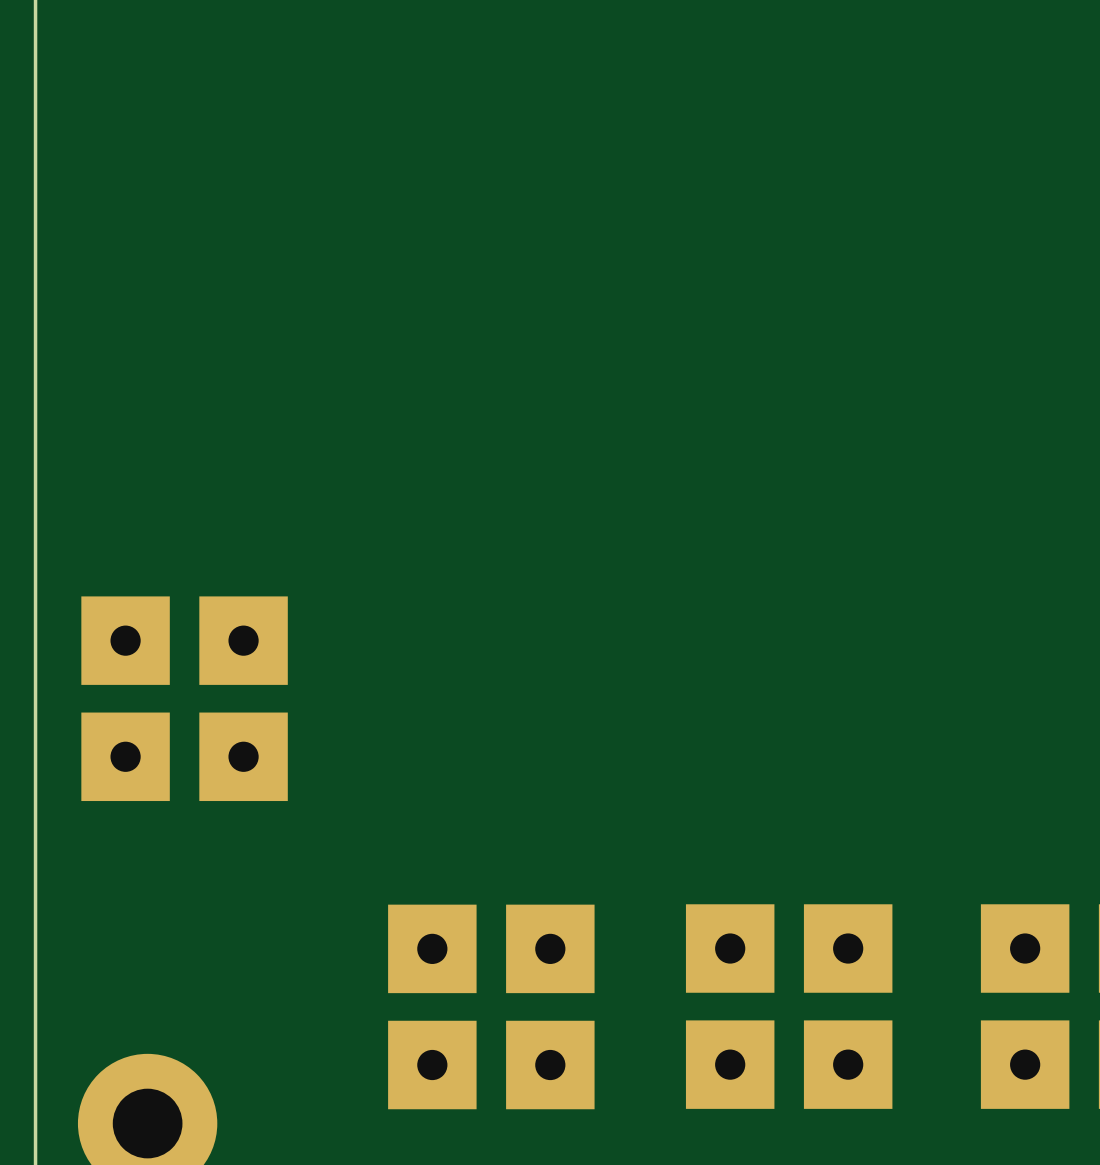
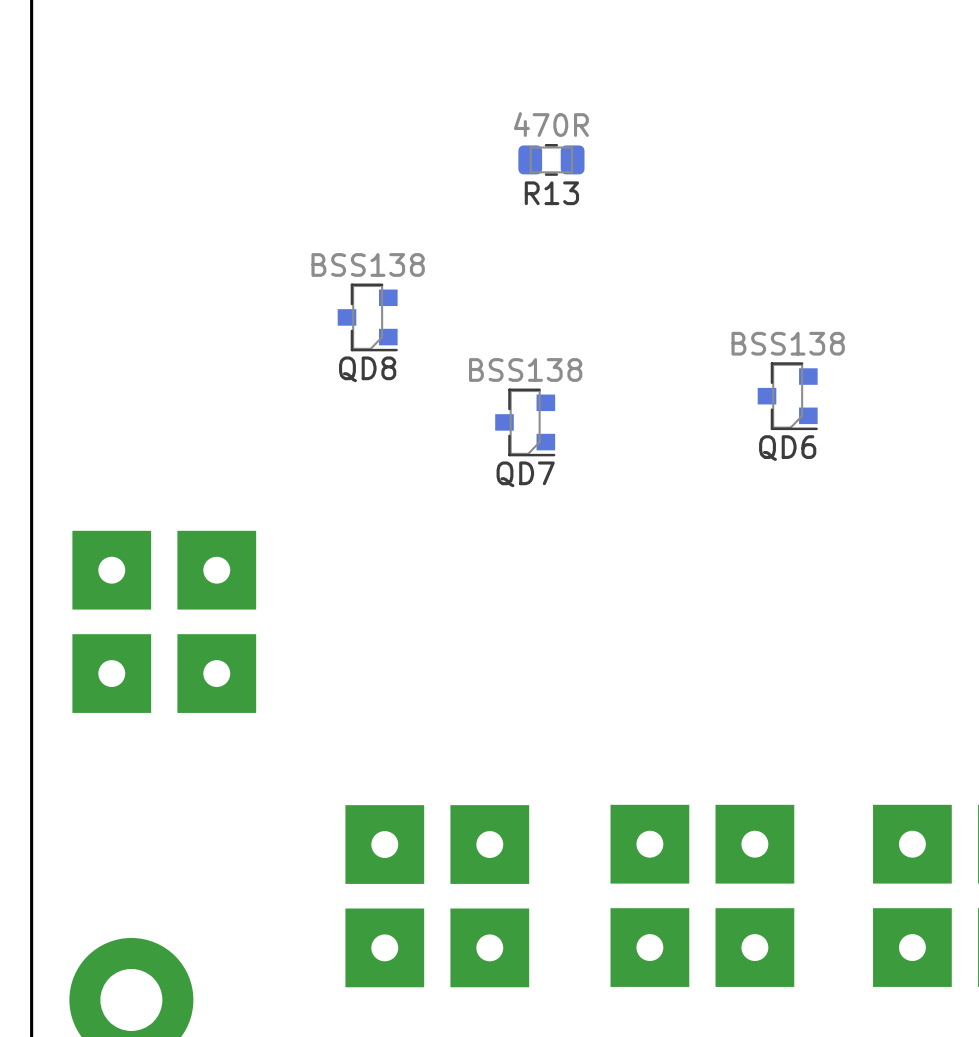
R13: none -> 470R (551, 159)
QD8: none -> BSS138 (367, 317)
QD6: none -> BSS138 (787, 396)
QD7: none -> BSS138 (525, 422)

